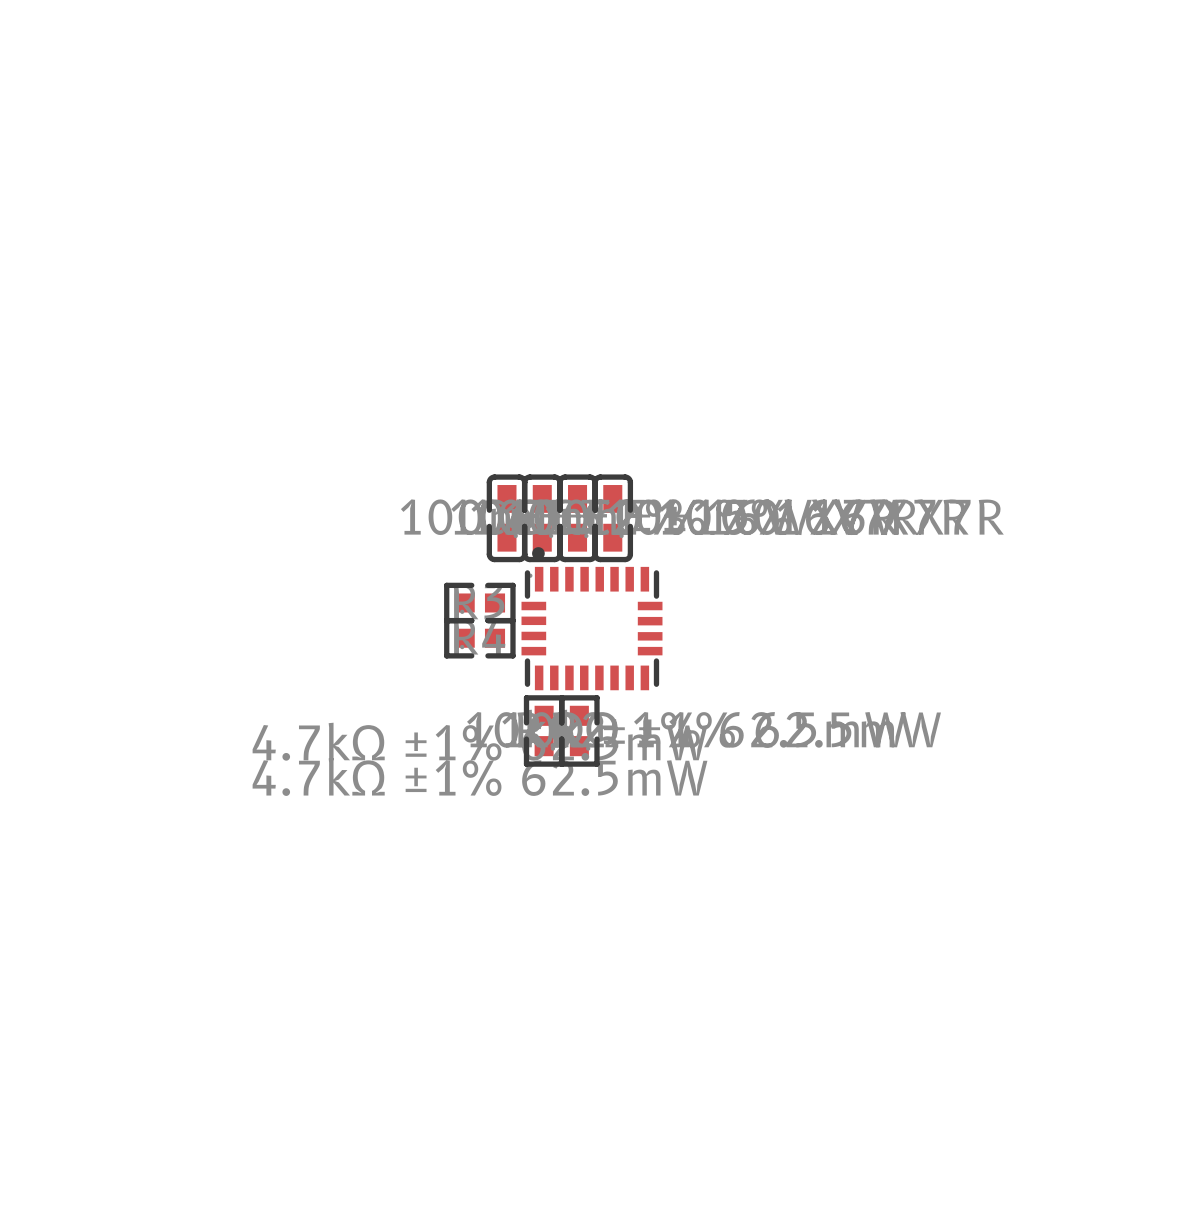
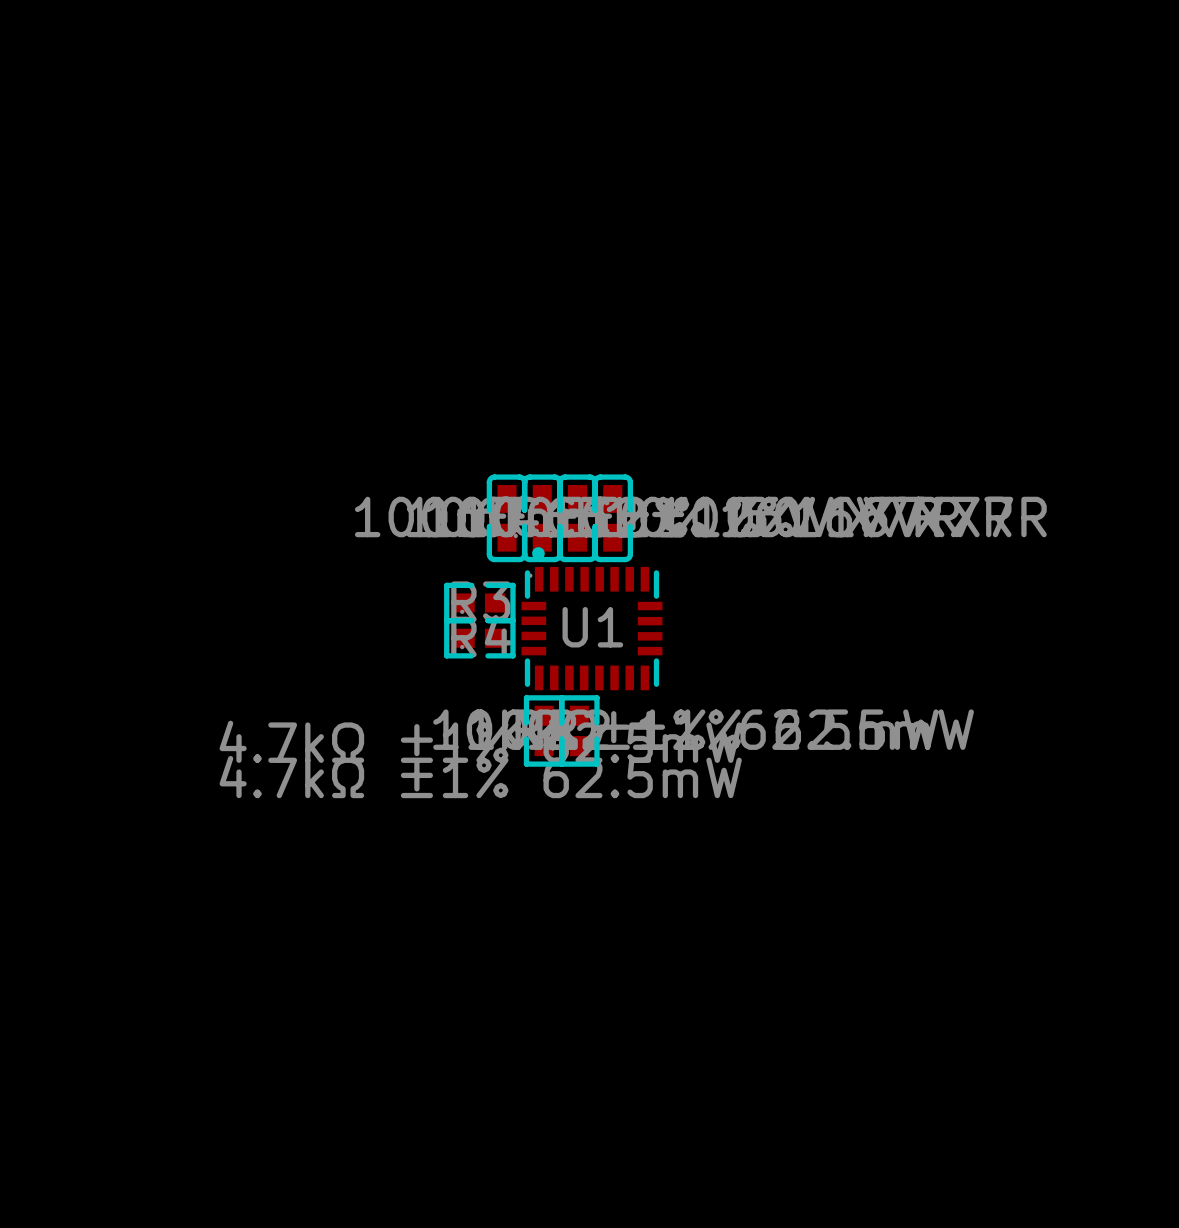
U1 name: none -> U1 (592, 627)

